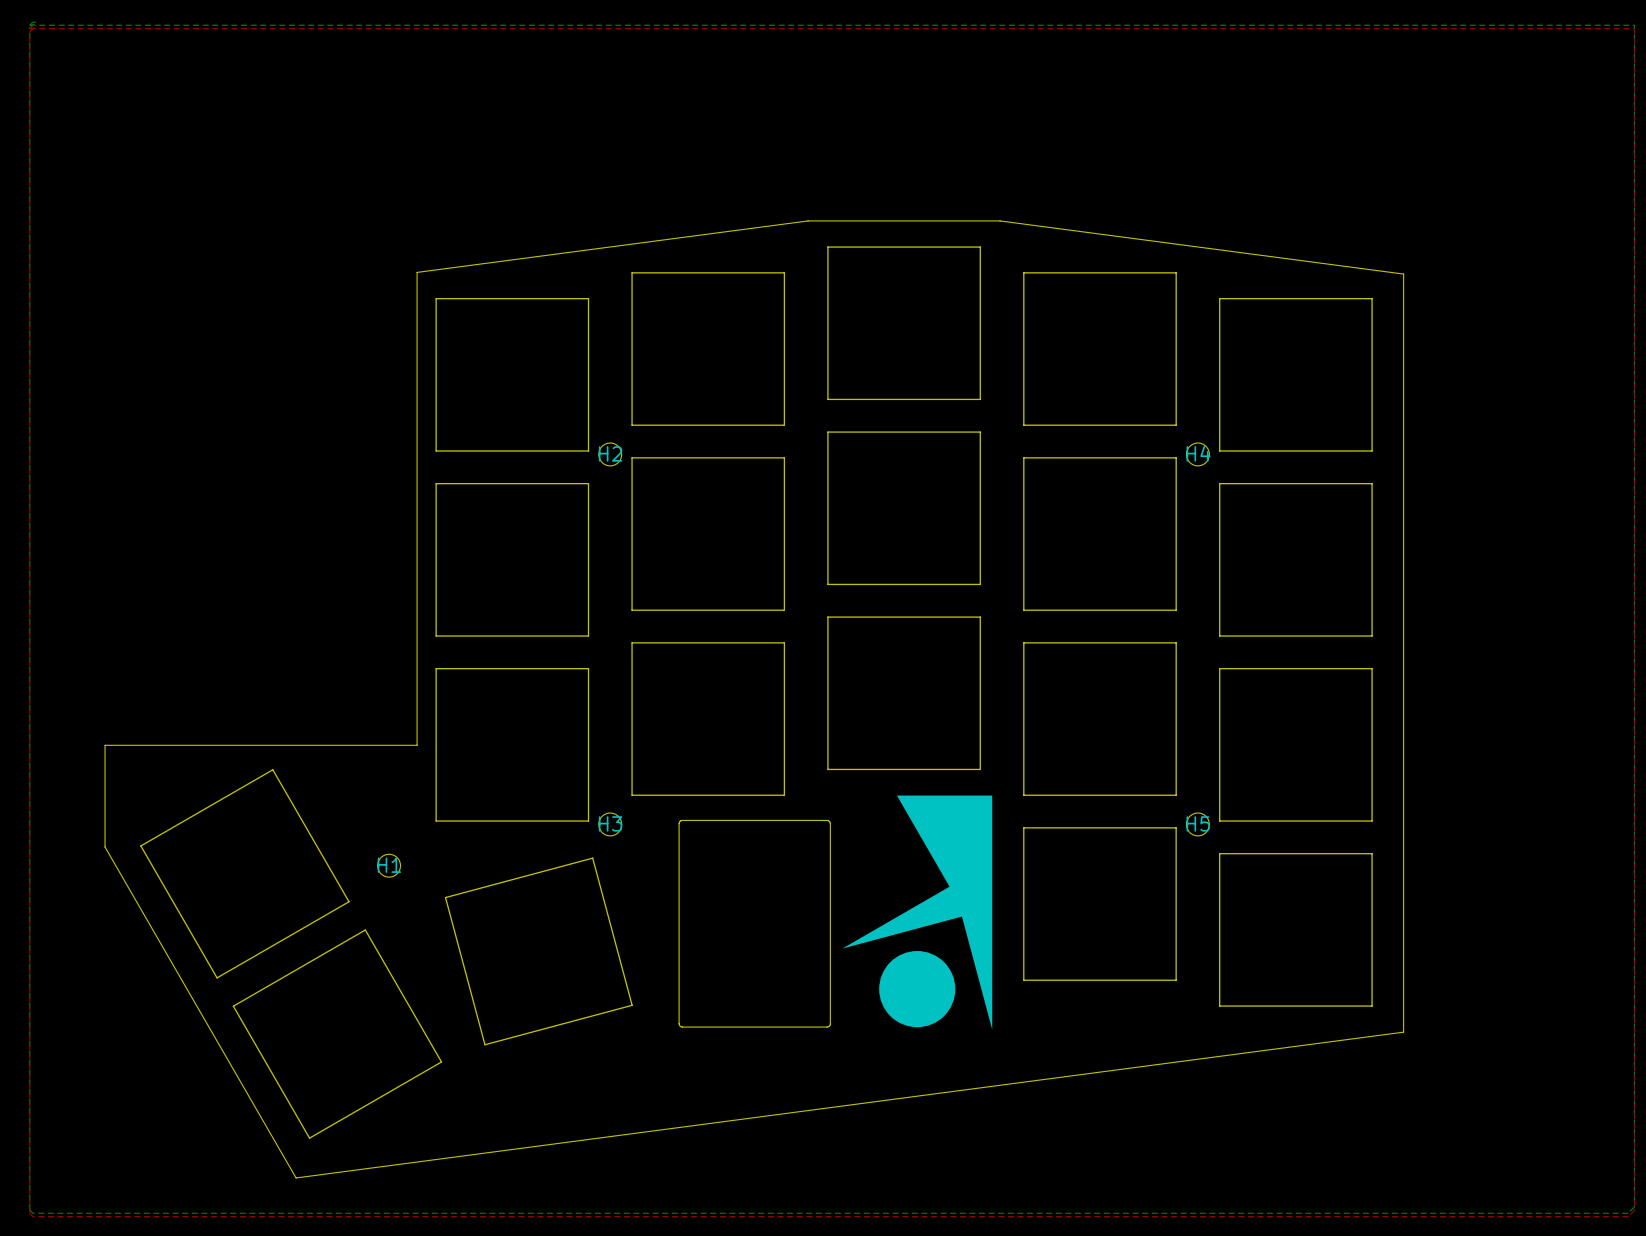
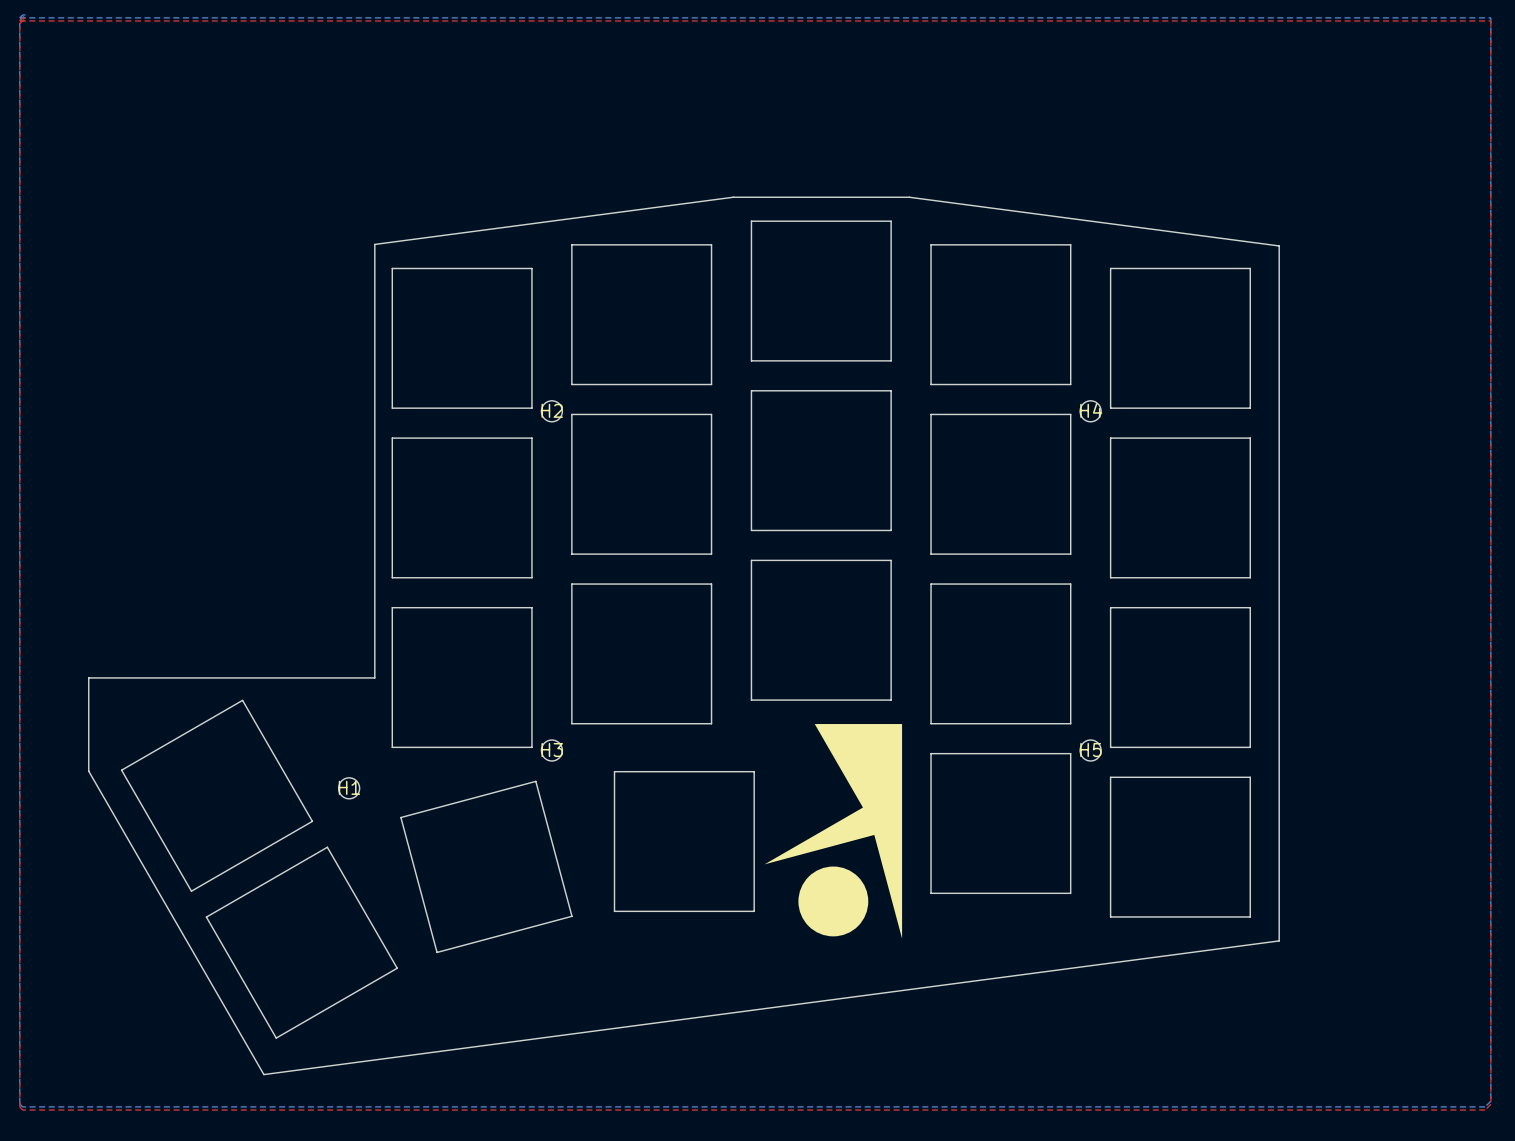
board edge: (682, 820) (679, 823) (679, 1025) (682, 1027) (828, 1026) (830, 1023) (829, 822) (827, 820) (682, 820) -> none
drawing: none -> [613, 771, 755, 912]

